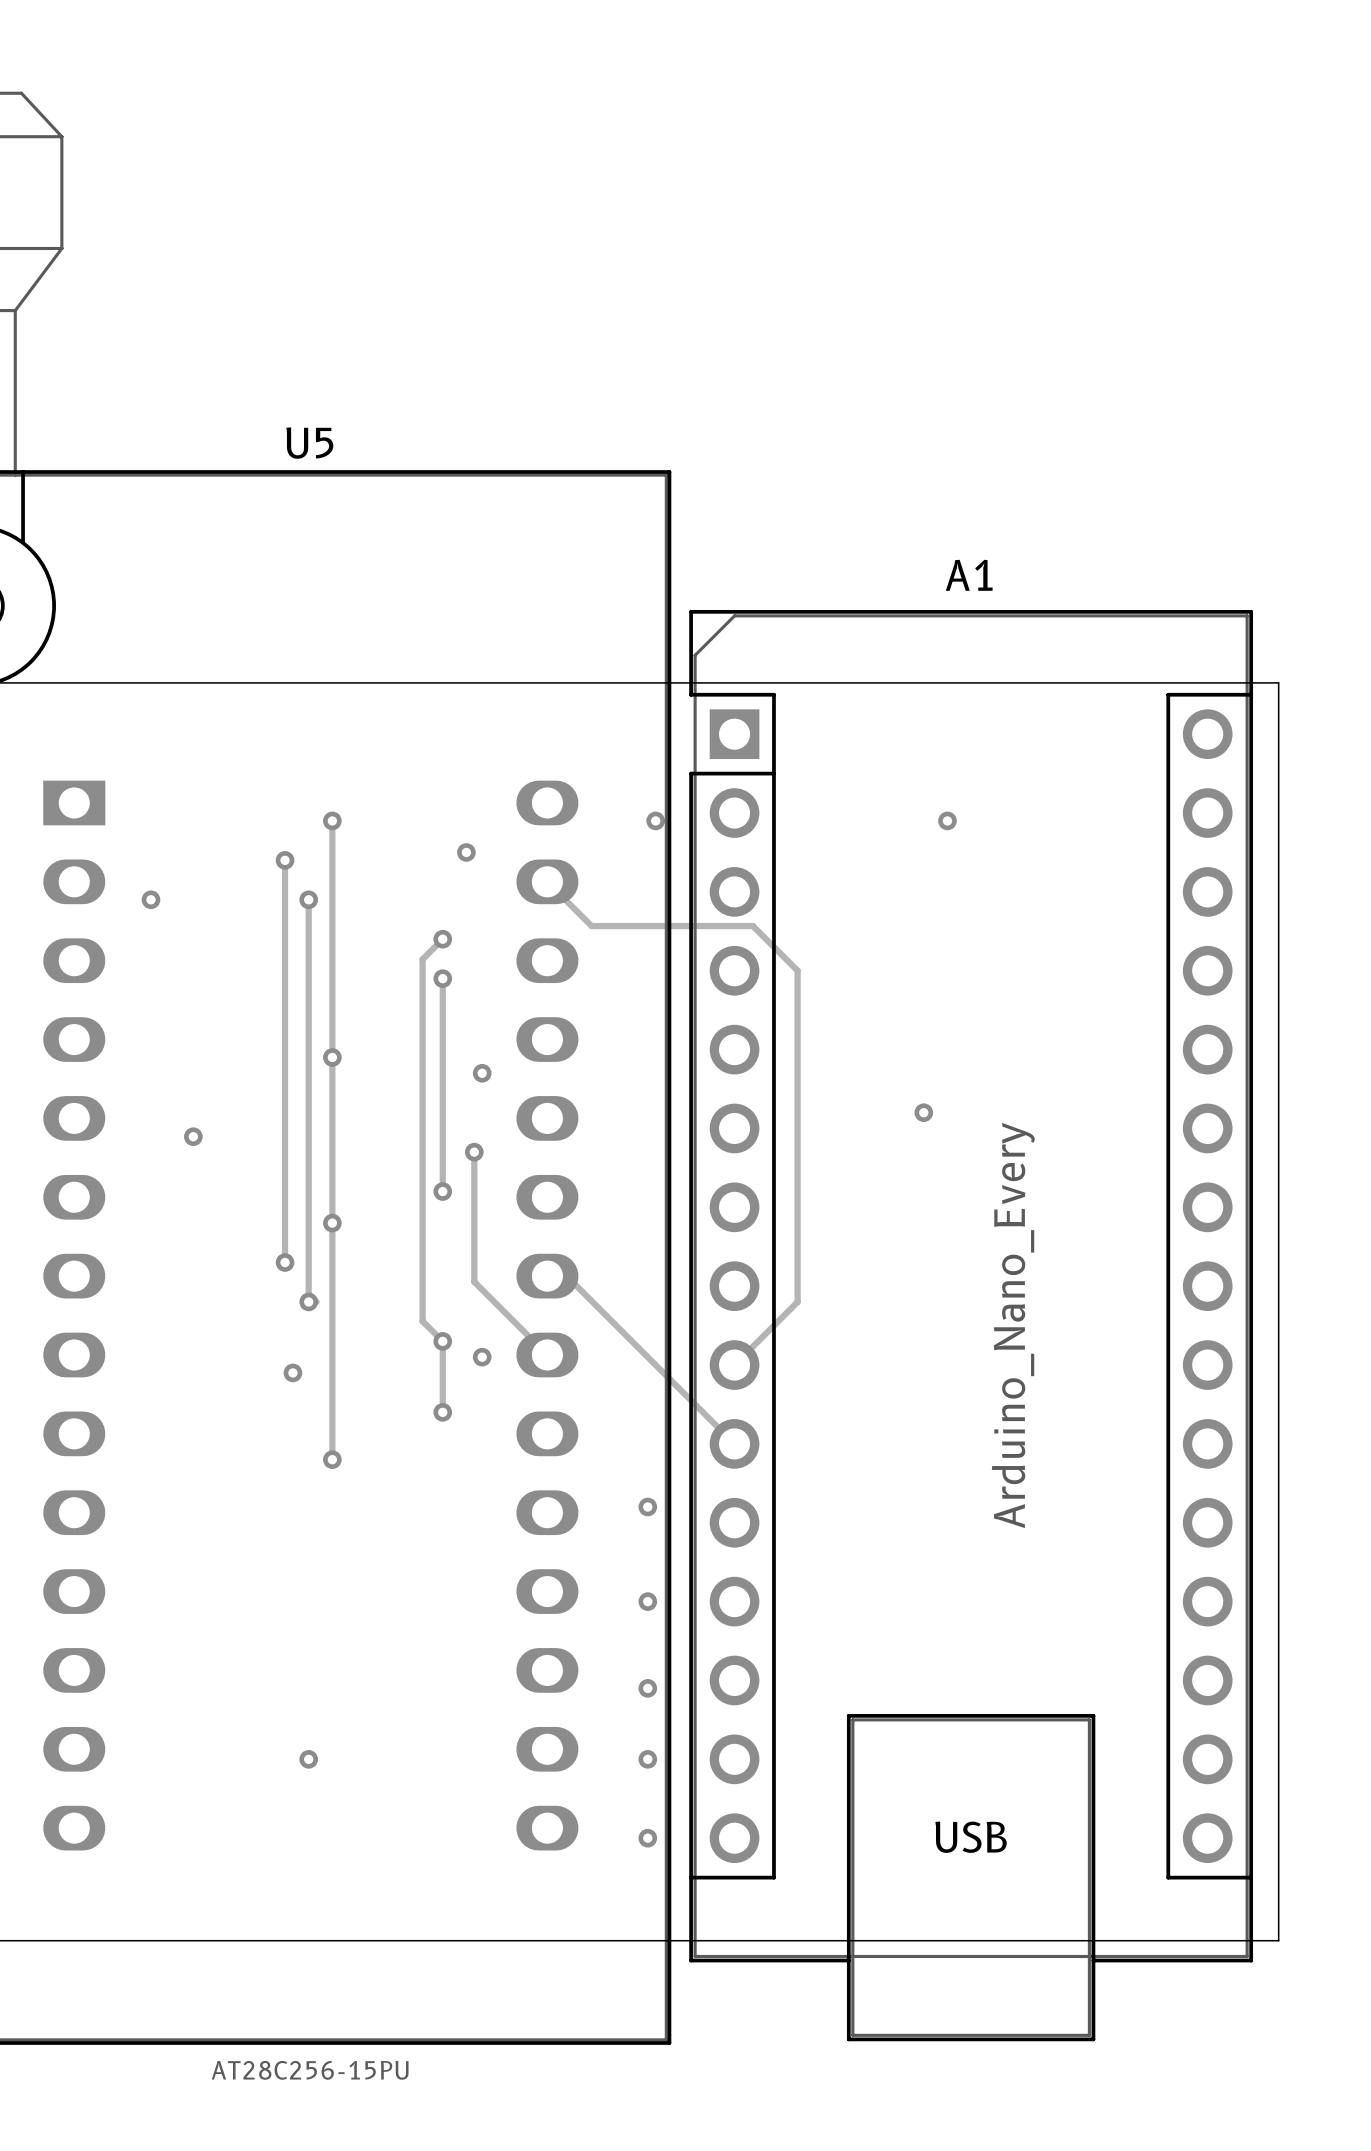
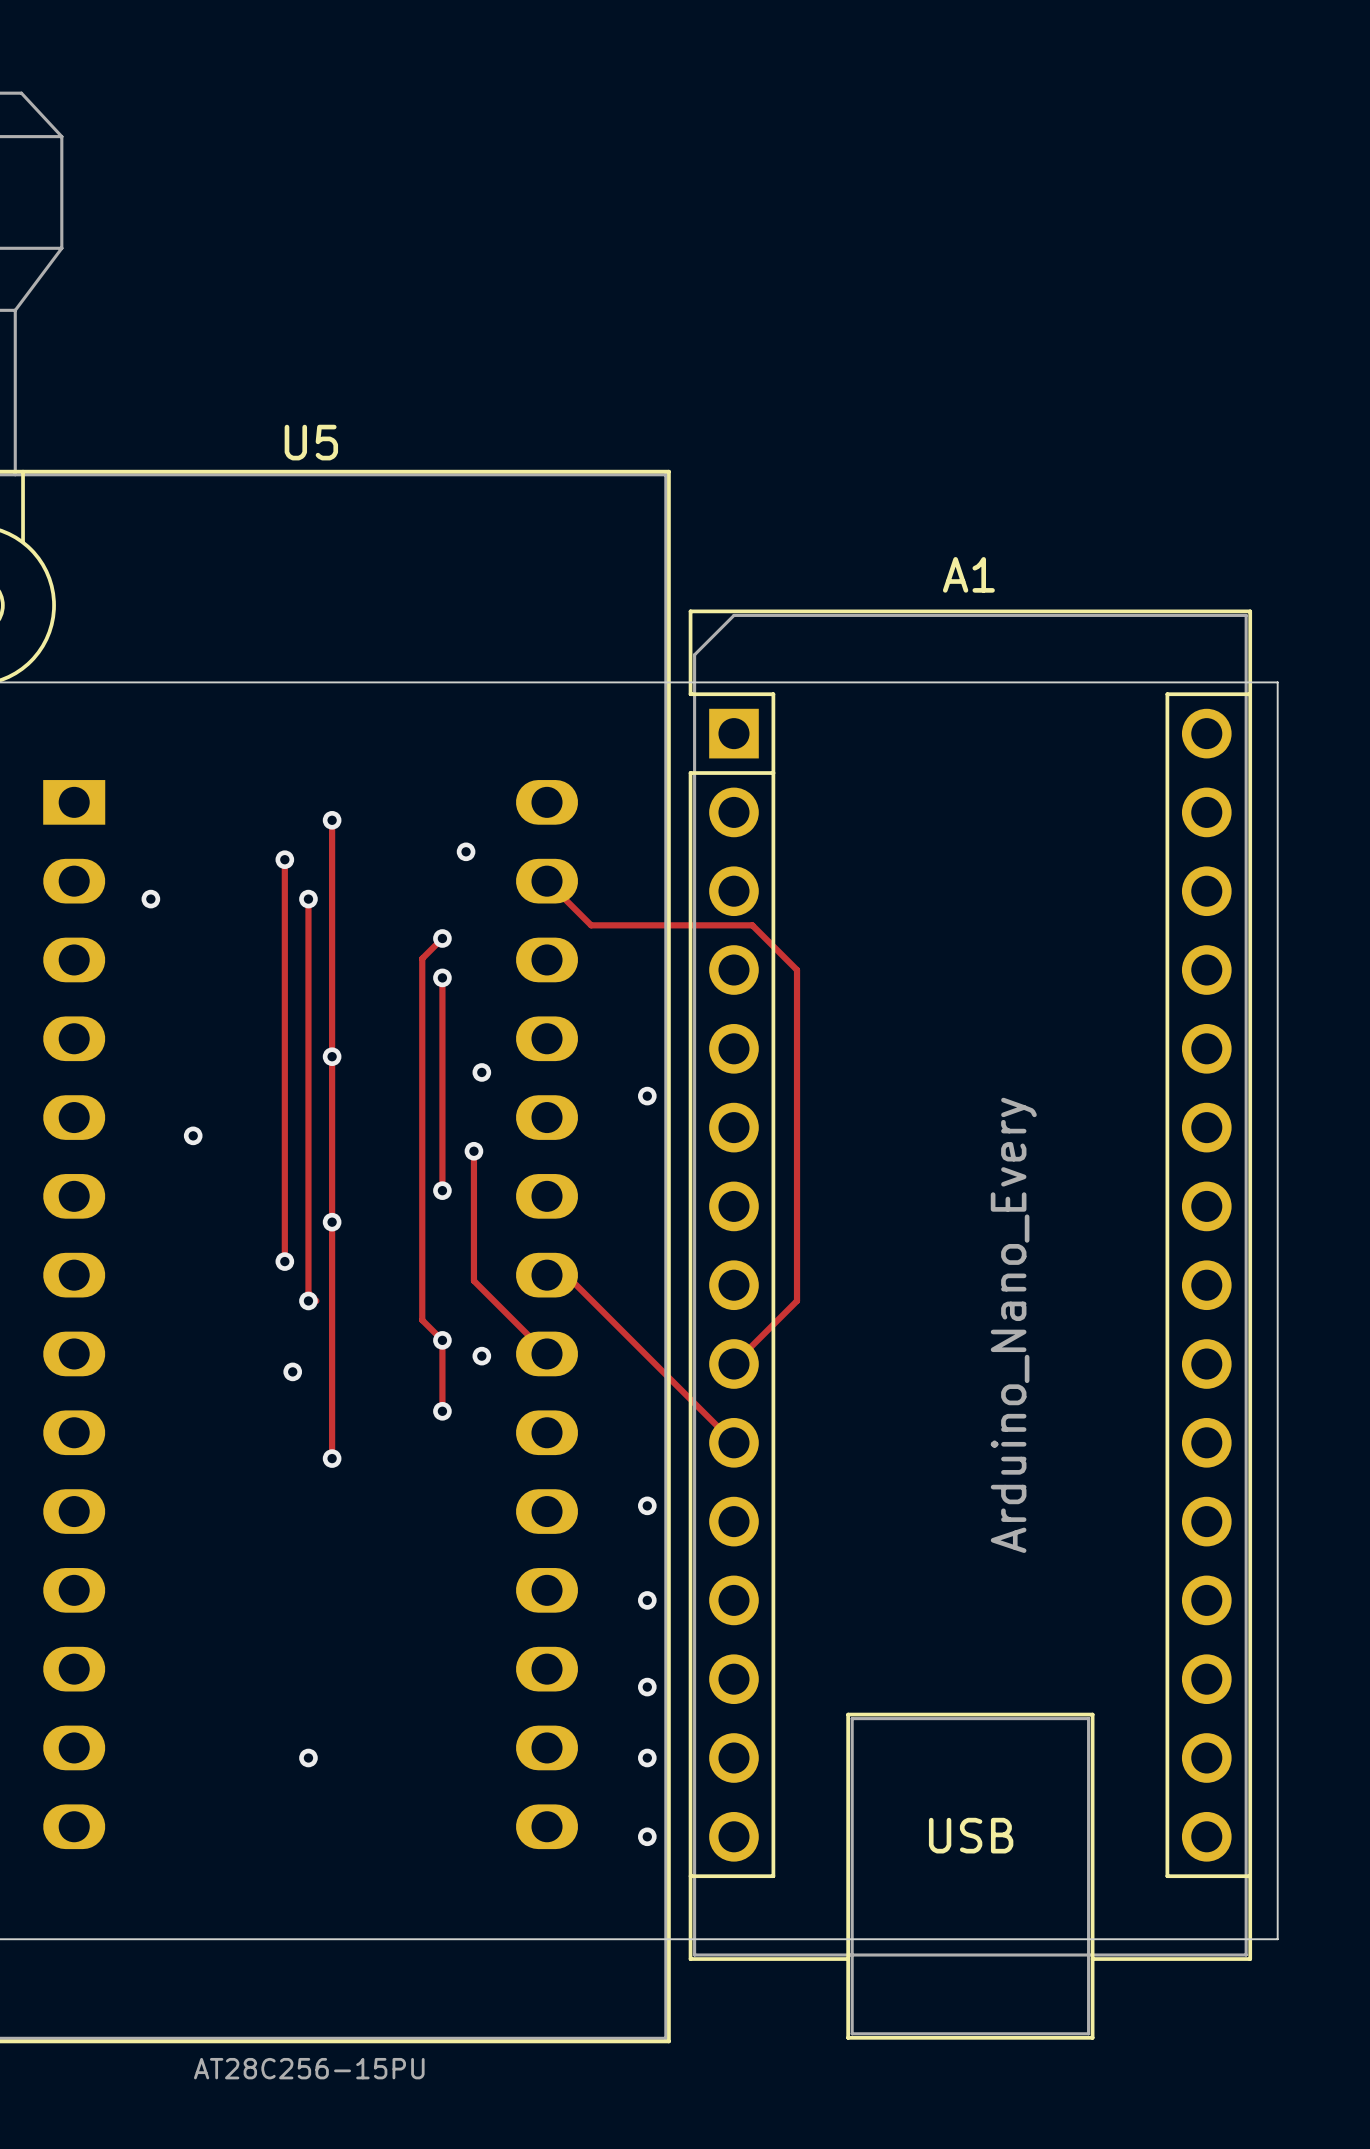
via: (655, 820) -> none
via: (947, 820) -> none
via: none -> (647, 1096)
via: (923, 1112) -> none

